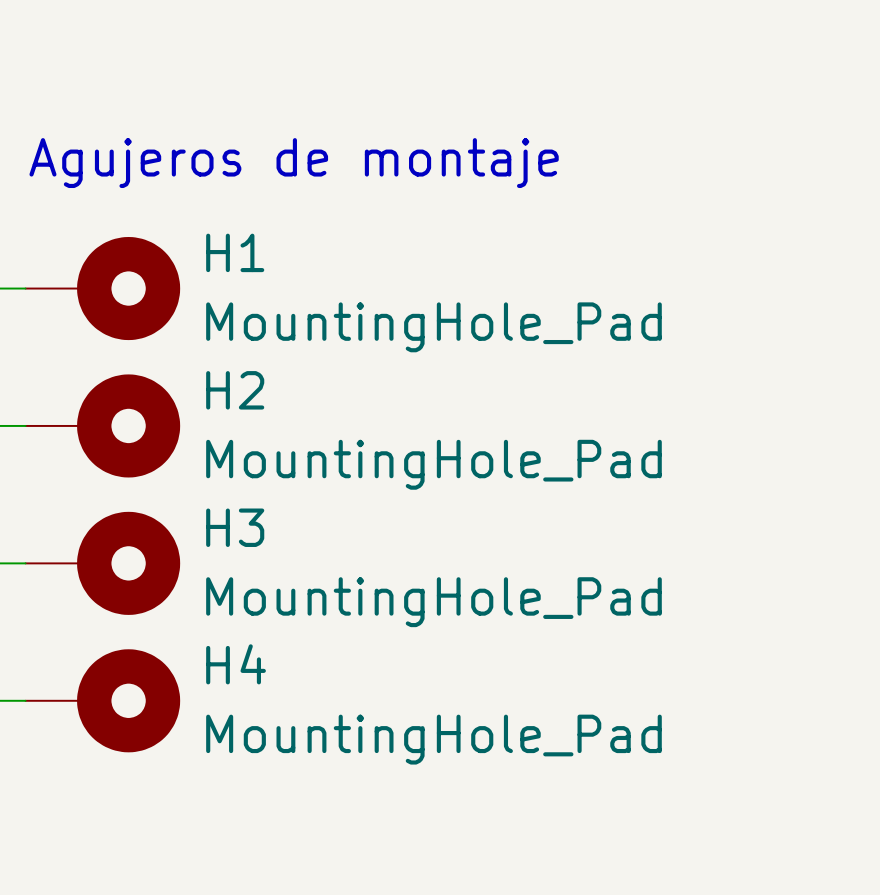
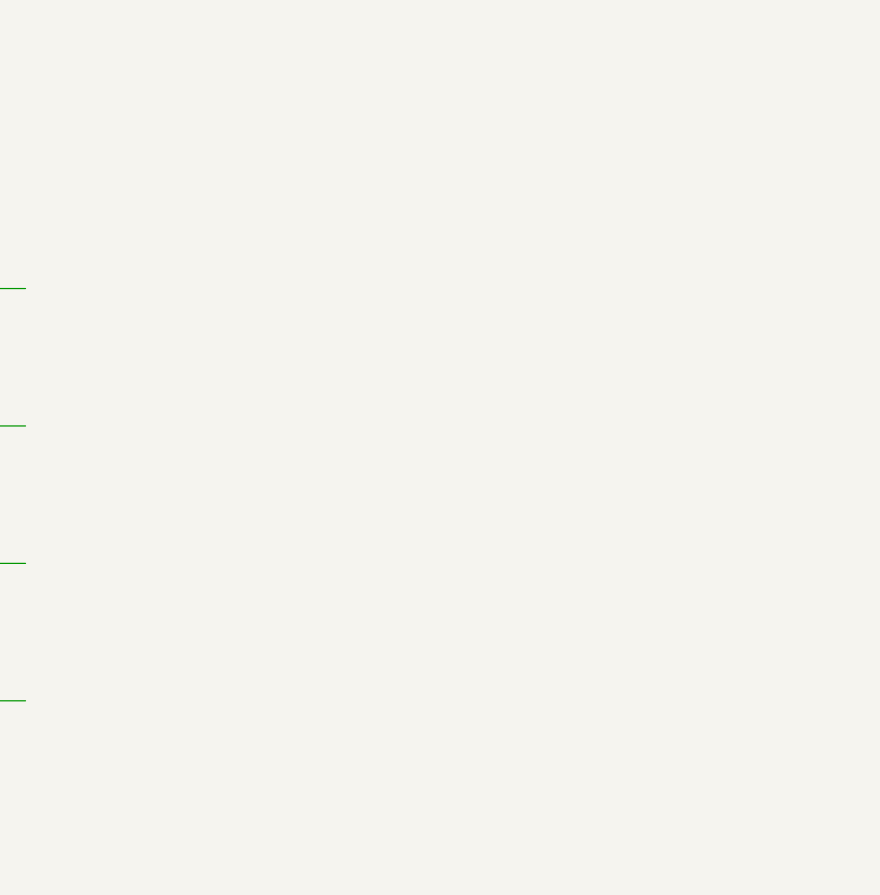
text: Agujeros de montaje (294, 163) -> none
H1: MountingHole_Pad (102, 288) -> none
H2: MountingHole_Pad (102, 425) -> none
H3: MountingHole_Pad (102, 563) -> none
H4: MountingHole_Pad (102, 700) -> none

